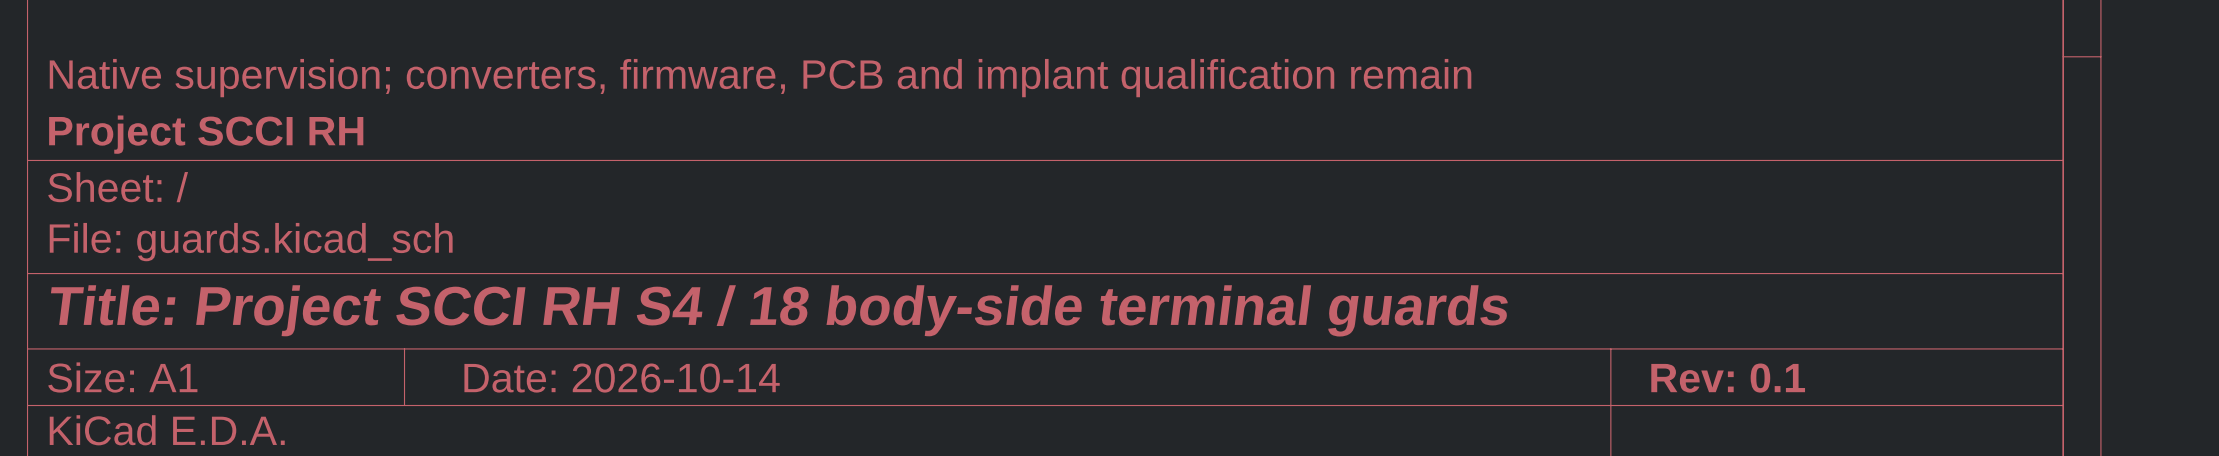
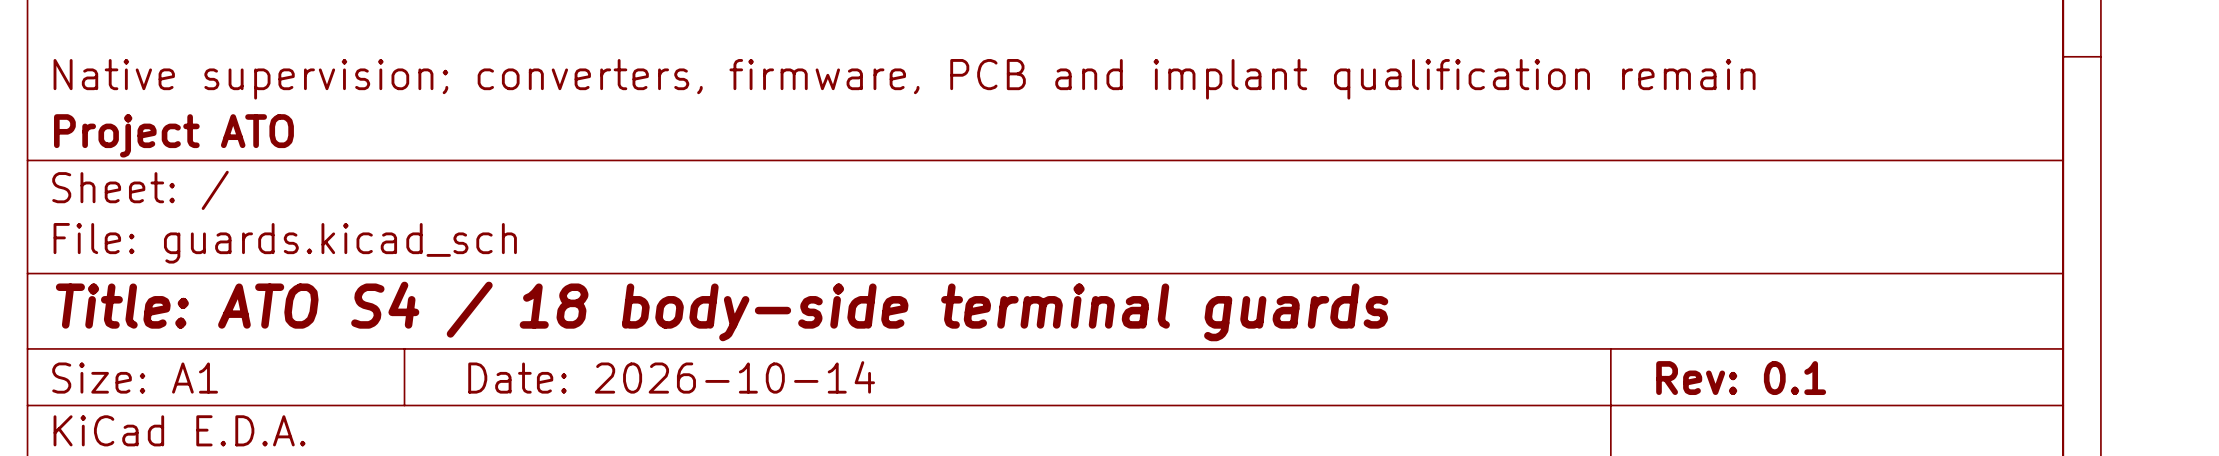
title block: Project SCCI RH (206, 134) -> Project ATO (173, 135)
title block: Title: Project SCCI RH S4 / 18 body-side terminal guards (779, 310) -> Title: ATO S4 / 18 body-side terminal guards (722, 311)

